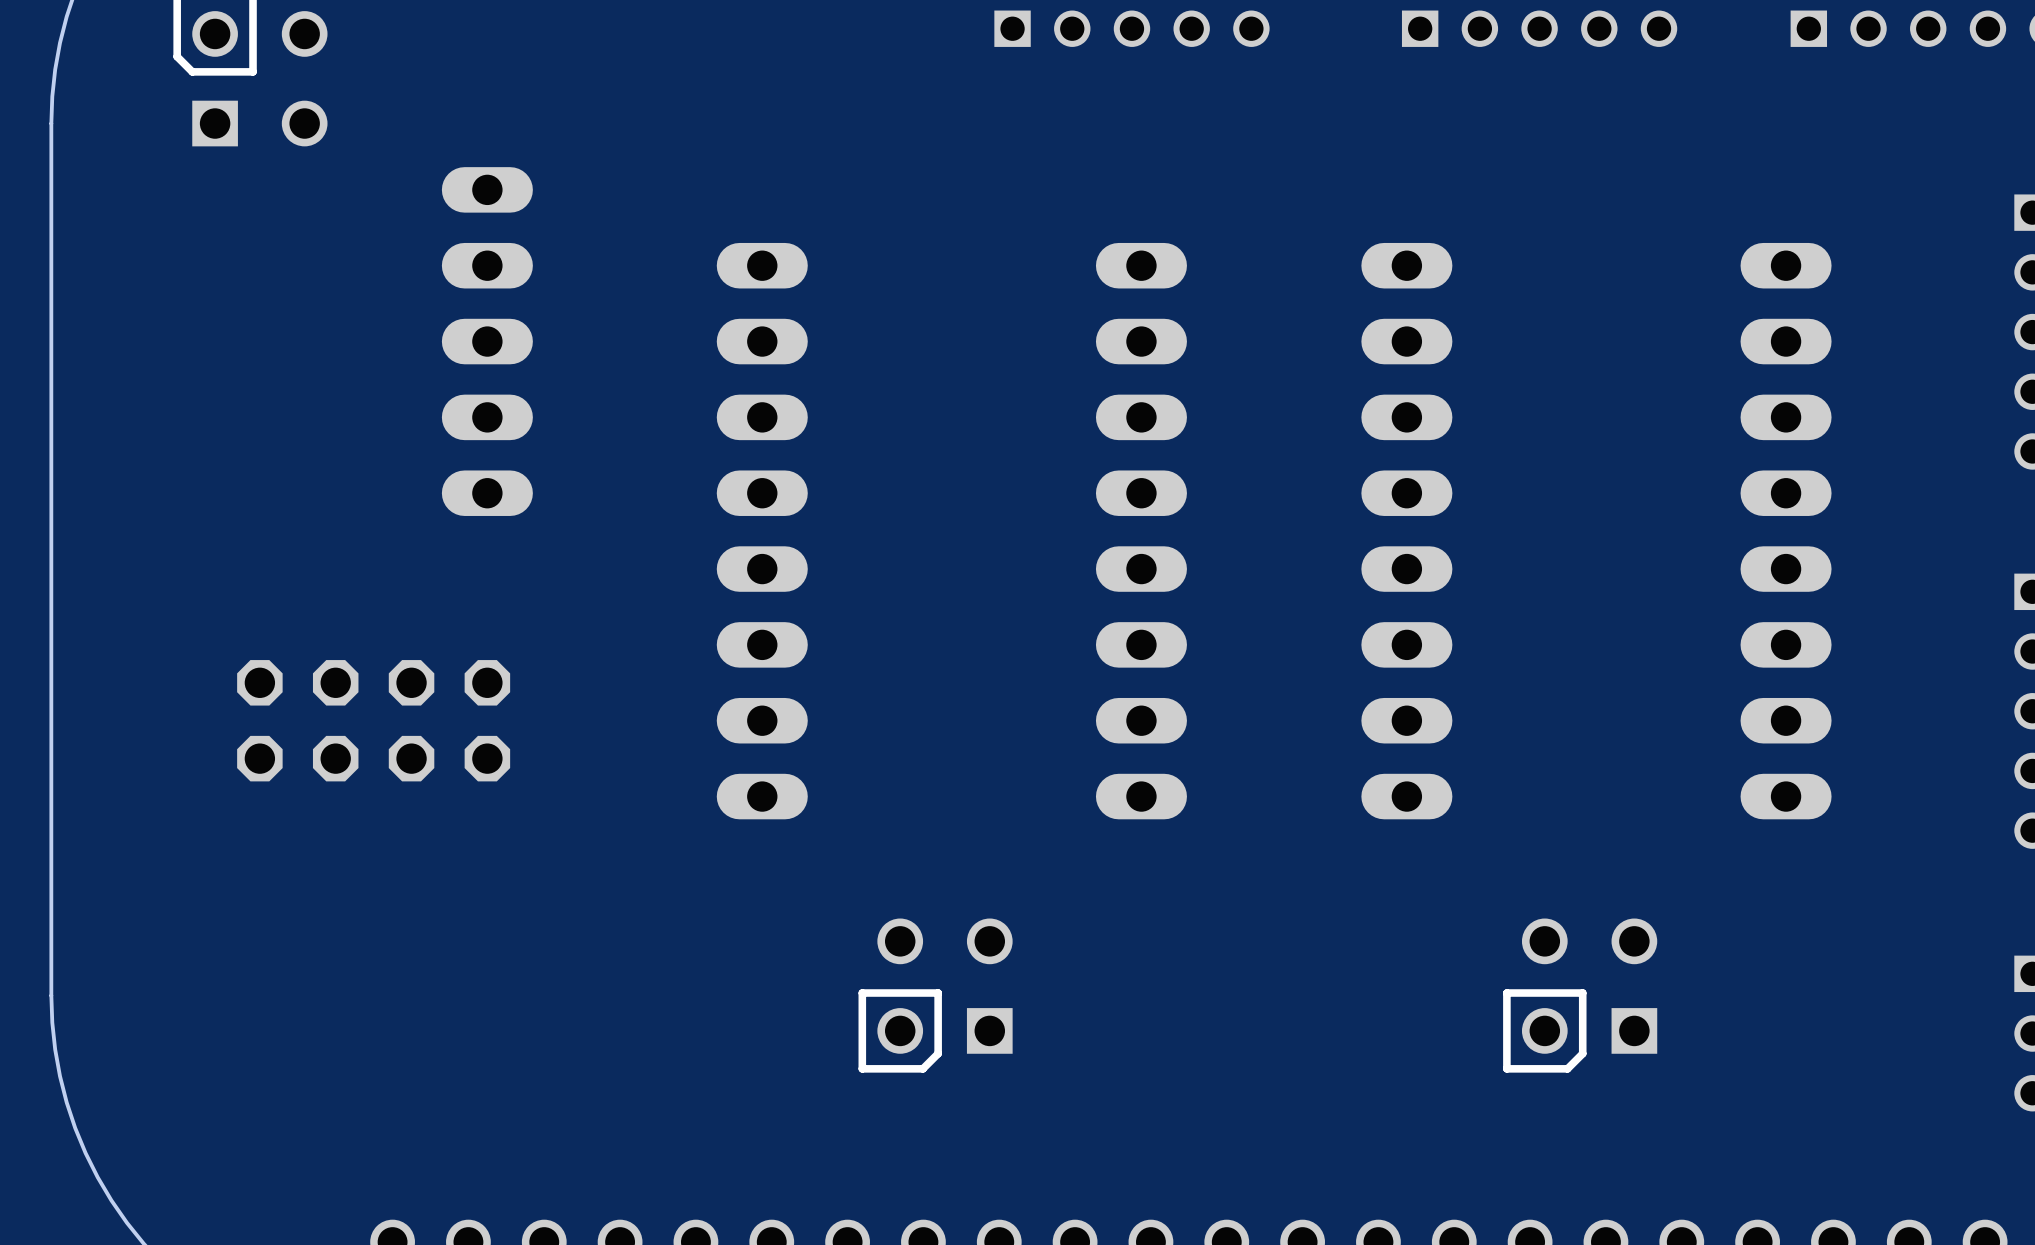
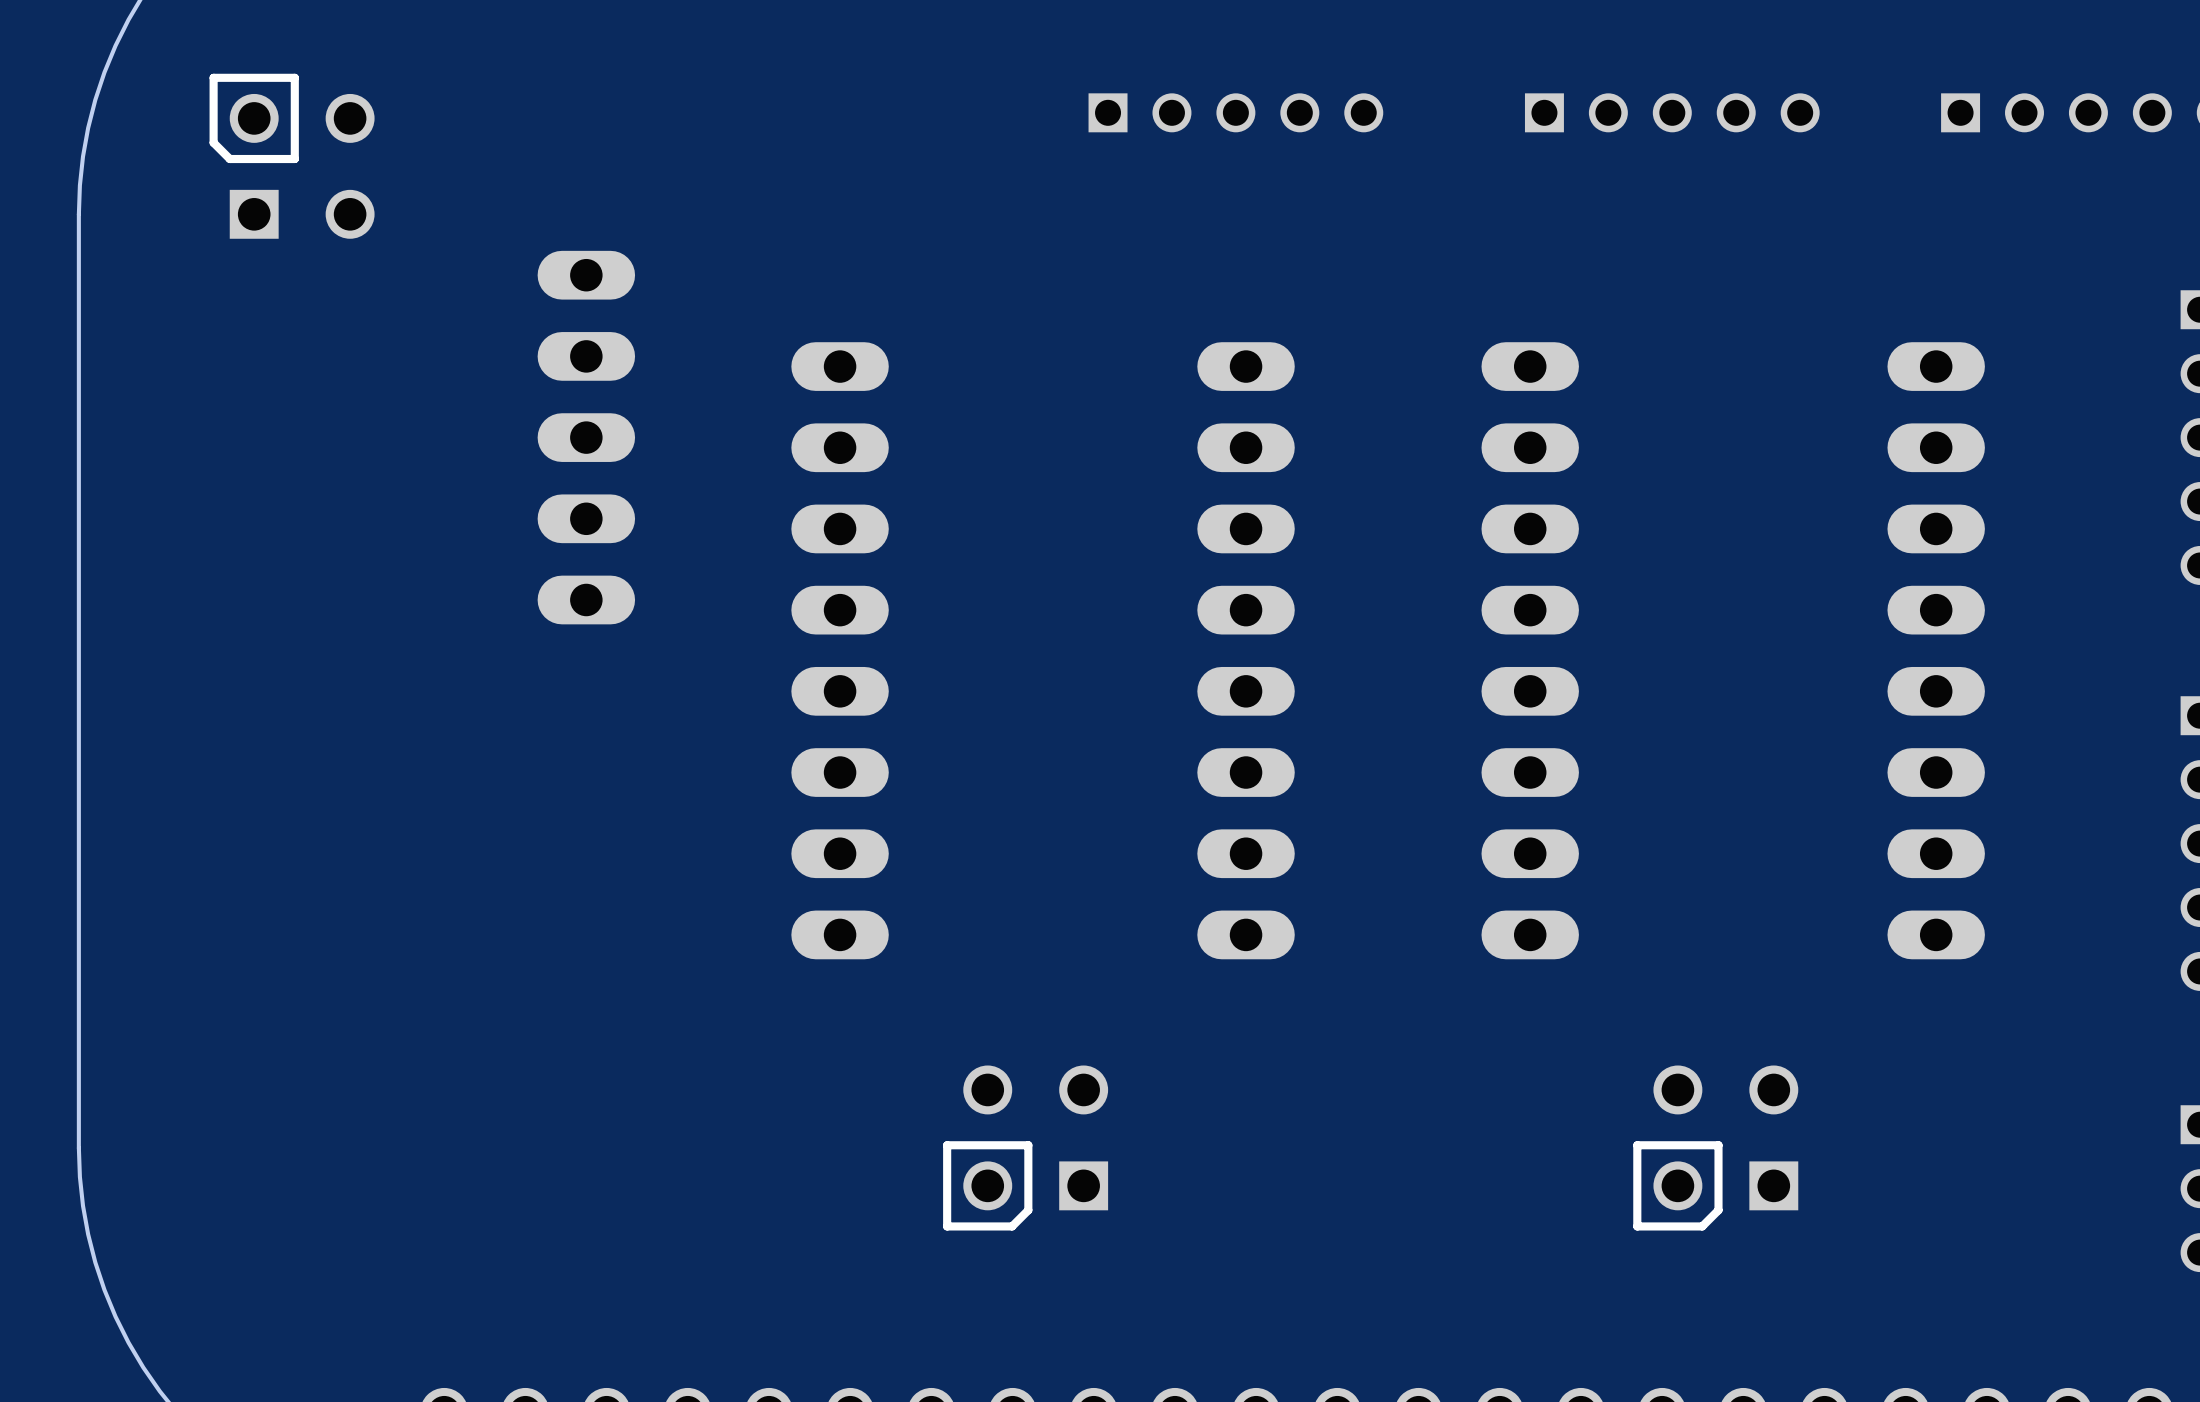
part position: (487, 341) -> (586, 437)
part: (373, 720) -> none

